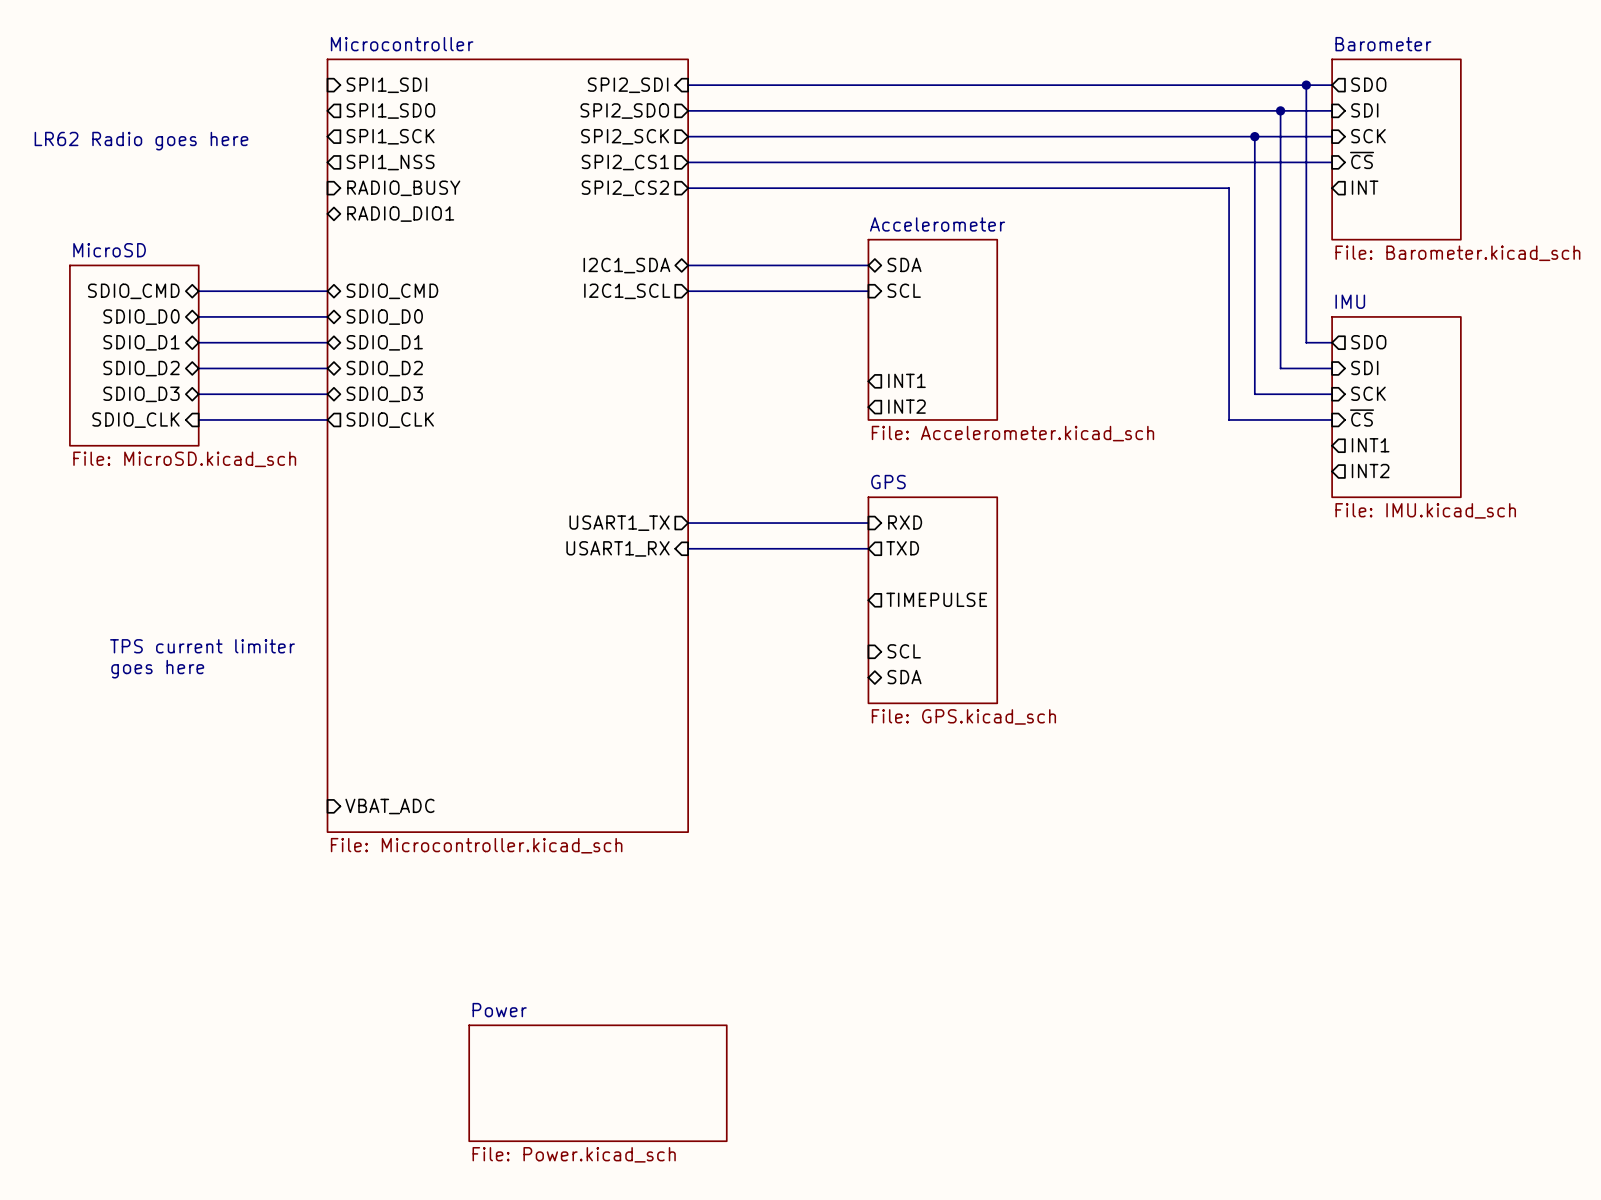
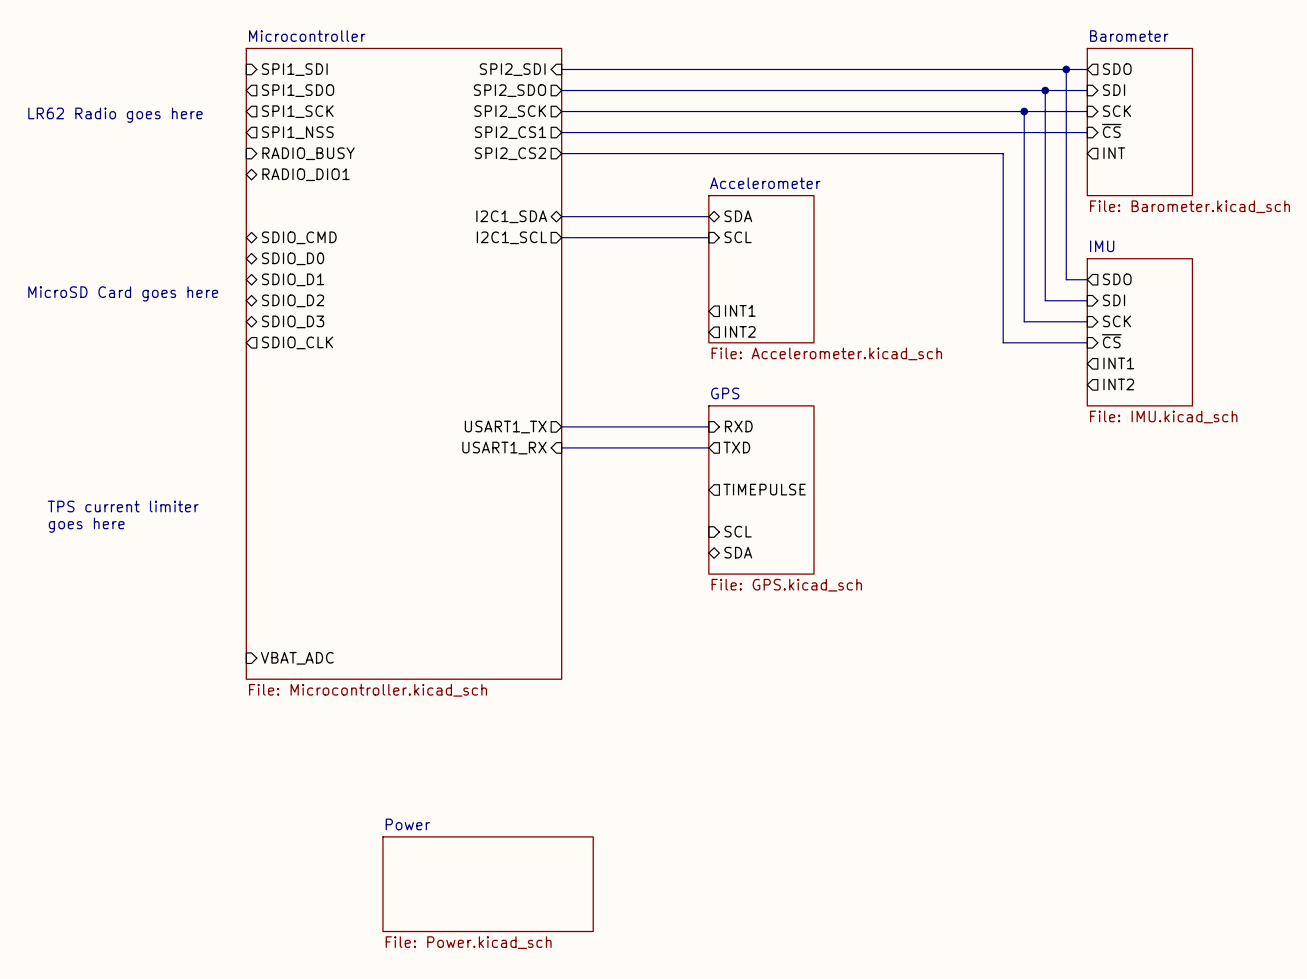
sheet pin position: SPI1_SDI (386, 85) -> SPI1_SDI (294, 69)
sheet pin position: SPI1_SDO (390, 111) -> SPI1_SDO (298, 90)
sheet pin position: SPI1_SCK (390, 136) -> SPI1_SCK (297, 111)
sheet pin position: SPI1_NSS (390, 162) -> SPI1_NSS (297, 132)
sheet pin position: RADIO_BUSY (403, 188) -> RADIO_BUSY (308, 153)
sheet pin position: RADIO_DIO1 (400, 214) -> RADIO_DIO1 (306, 174)
sheet pin: SDIO_CMD (133, 291) -> none
wire: (198, 291) (327, 291) -> none
sheet pin position: SDIO_CMD (392, 291) -> SDIO_CMD (299, 237)
wire: (198, 316) (327, 316) -> none
sheet pin: SDIO_D0 (141, 317) -> none
sheet pin position: SDIO_D0 (384, 317) -> SDIO_D0 (293, 258)
sheet pin: SDIO_D1 (141, 342) -> none
wire: (198, 342) (327, 342) -> none
sheet pin position: SDIO_D1 (384, 342) -> SDIO_D1 (293, 279)
sheet MicroSD: File: MicroSD.kicad_sch (134, 355) -> none
text: none -> MicroSD Card goes here (123, 293)
sheet pin: SDIO_D2 (141, 368) -> none
wire: (198, 368) (327, 368) -> none
sheet pin position: SDIO_D2 (384, 368) -> SDIO_D2 (293, 300)
sheet pin: SDIO_D3 (141, 394) -> none
wire: (198, 394) (327, 394) -> none
sheet pin position: SDIO_D3 (384, 394) -> SDIO_D3 (293, 321)
wire: (198, 419) (327, 419) -> none
sheet pin: SDIO_CLK (135, 420) -> none
sheet pin position: SDIO_CLK (390, 420) -> SDIO_CLK (297, 342)
sheet Microcontroller: none -> File: Microcontroller.kicad_sch (403, 363)
sheet Microcontroller: File: Microcontroller.kicad_sch (507, 445) -> none
text position: TPS current limiter (202, 646) -> TPS current limiter (123, 506)
text position: goes here (157, 669) -> goes here (86, 525)
sheet pin position: VBAT_ADC (389, 806) -> VBAT_ADC (297, 658)

